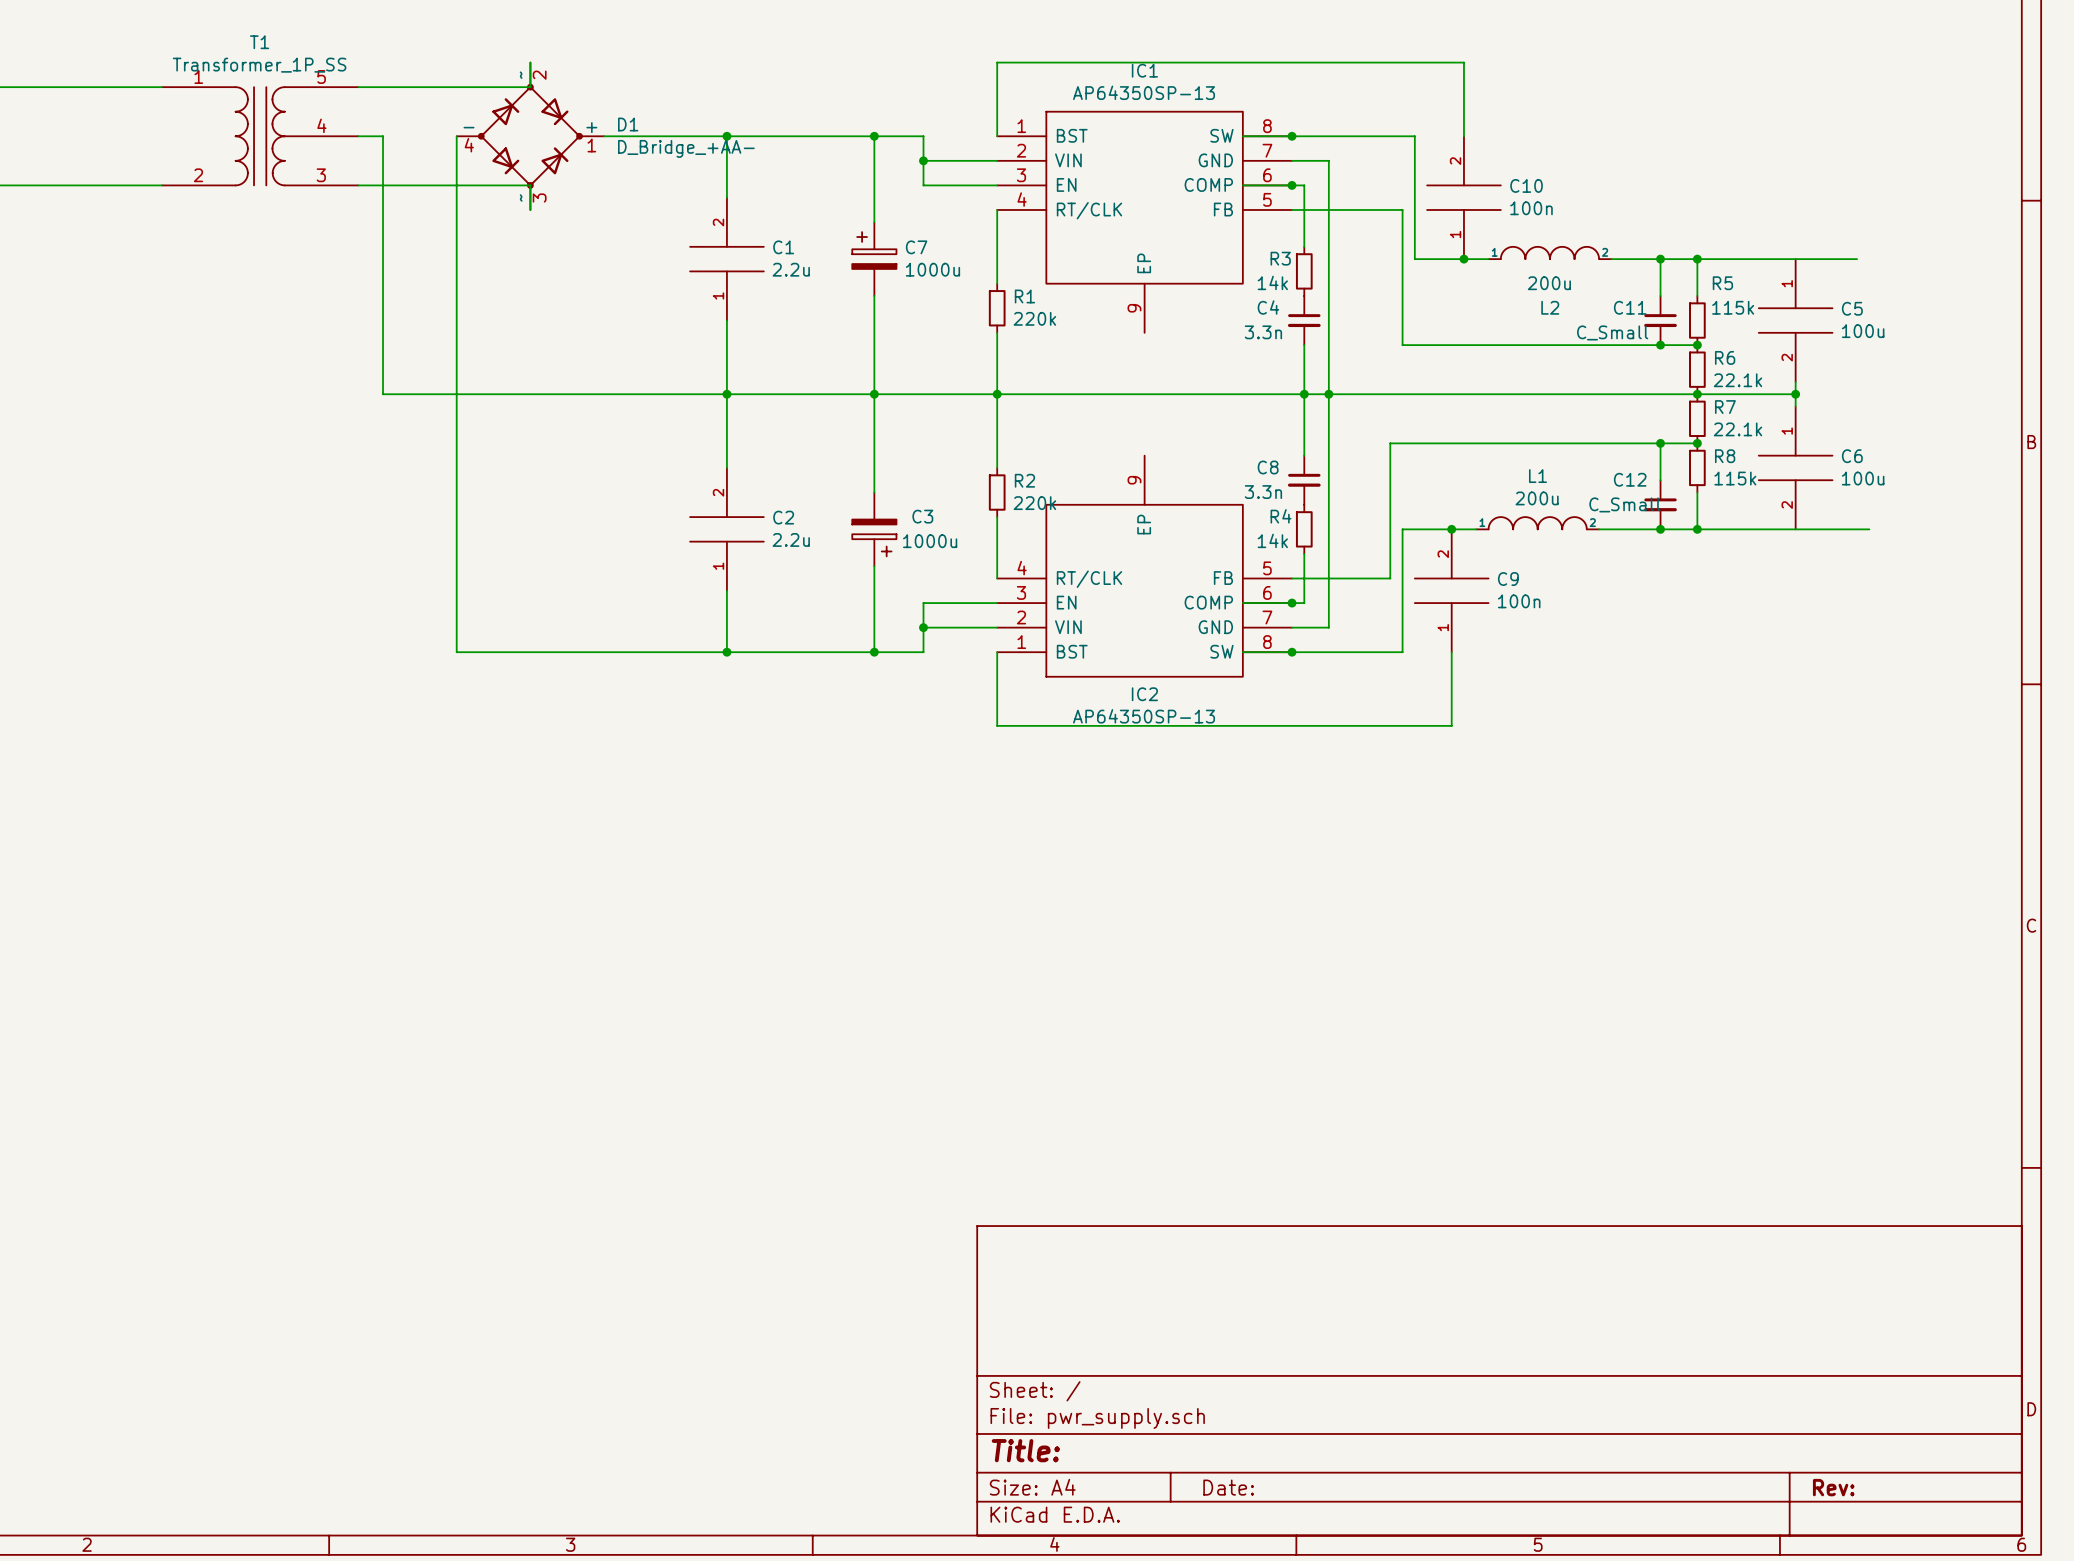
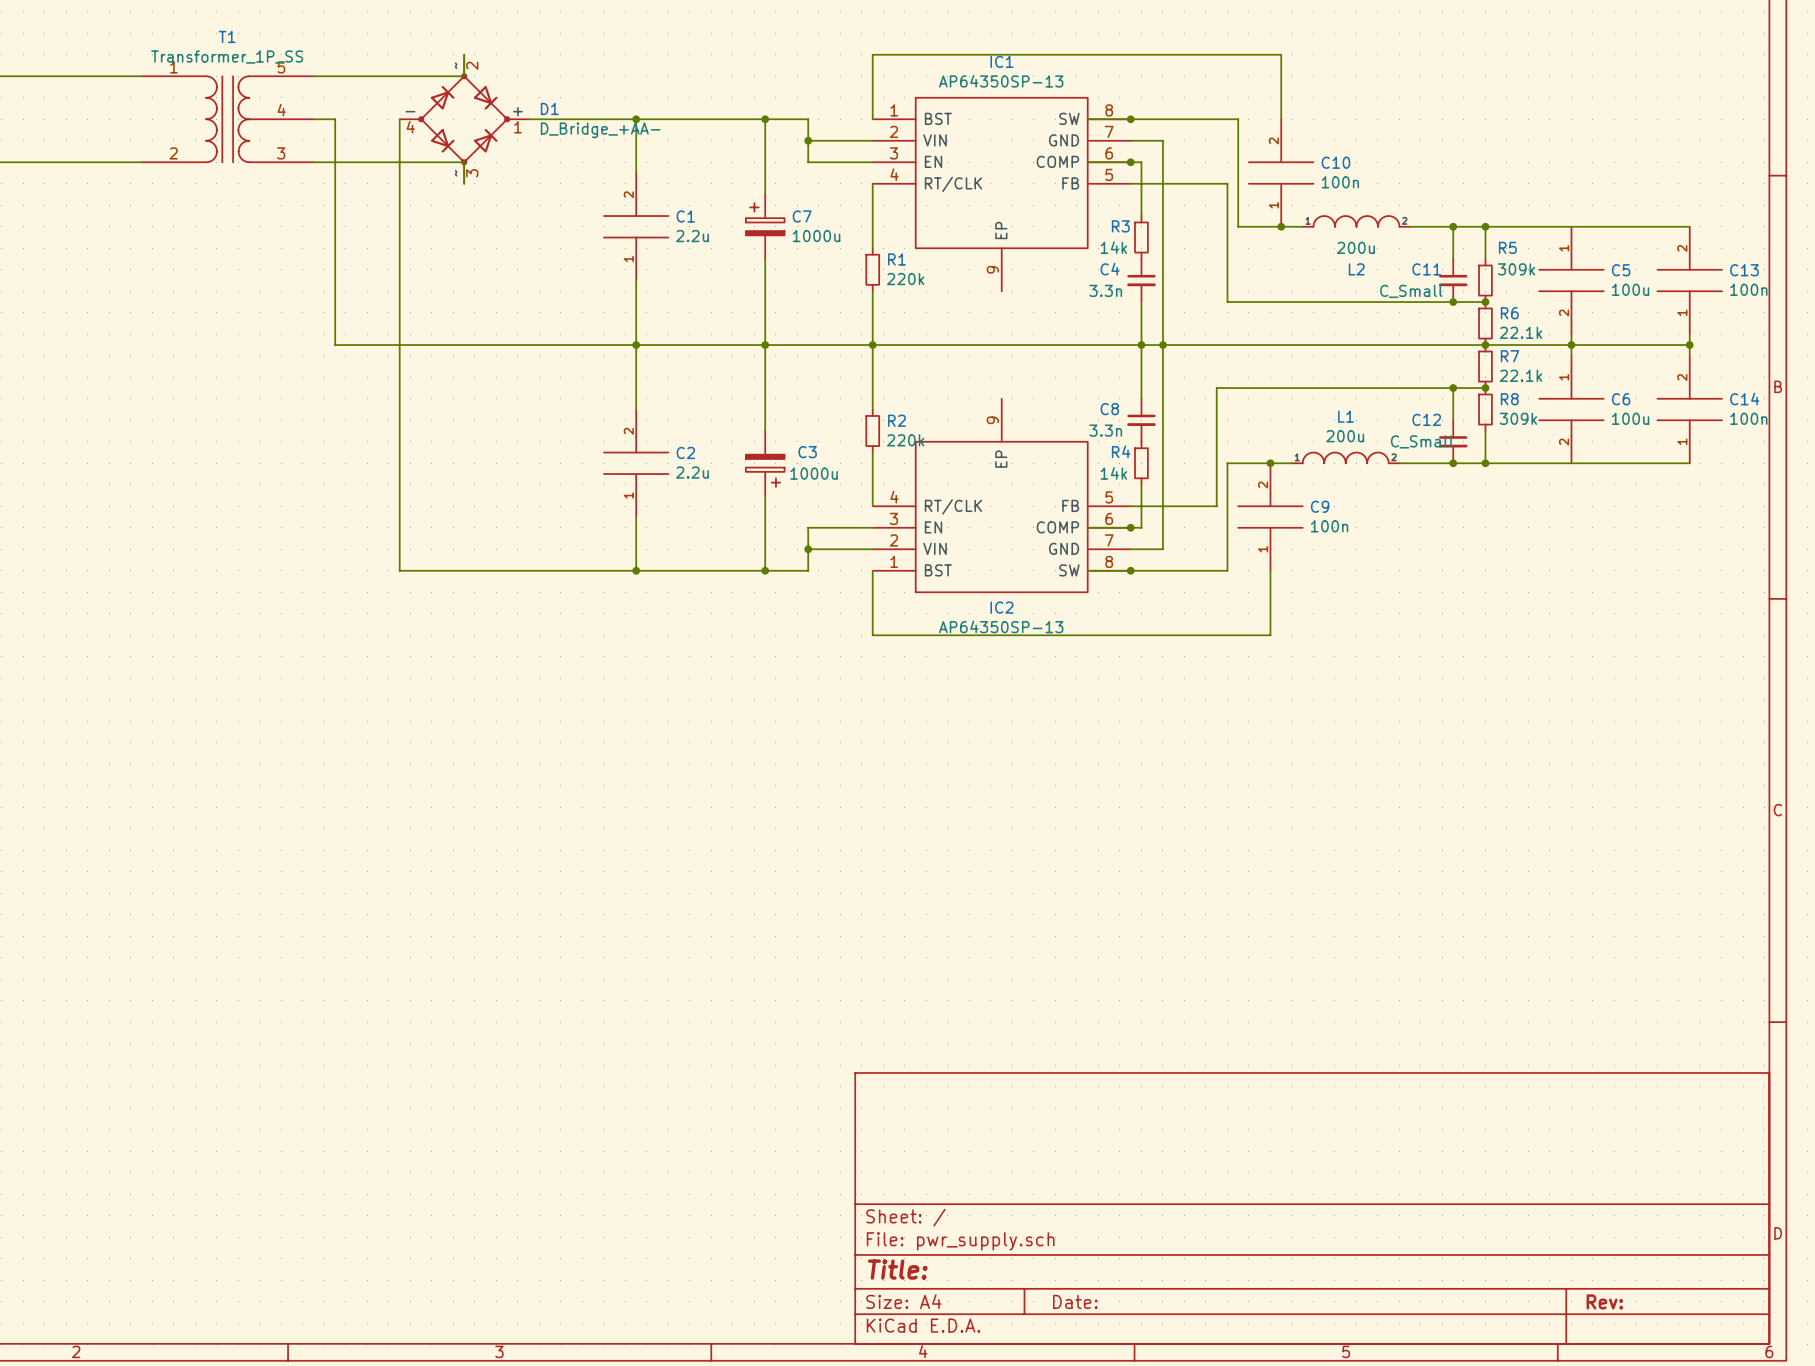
wire: none -> (1625, 226) (1689, 226)
R5 value: 115k (1733, 307) -> 309k (1516, 269)
C13: none -> 100n (1689, 280)
wire: none -> (1689, 334) (1689, 355)
wire: none -> (1571, 345) (1689, 345)
junction: none -> (1689, 345)
C14: none -> 100n (1689, 409)
R8 value: 115k (1735, 478) -> 309k (1518, 418)
wire: none -> (1635, 463) (1689, 463)

